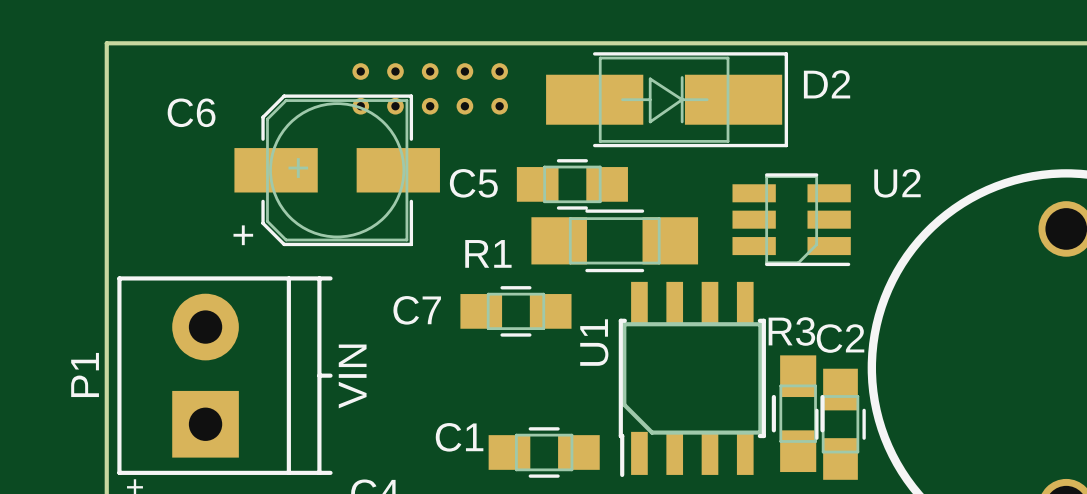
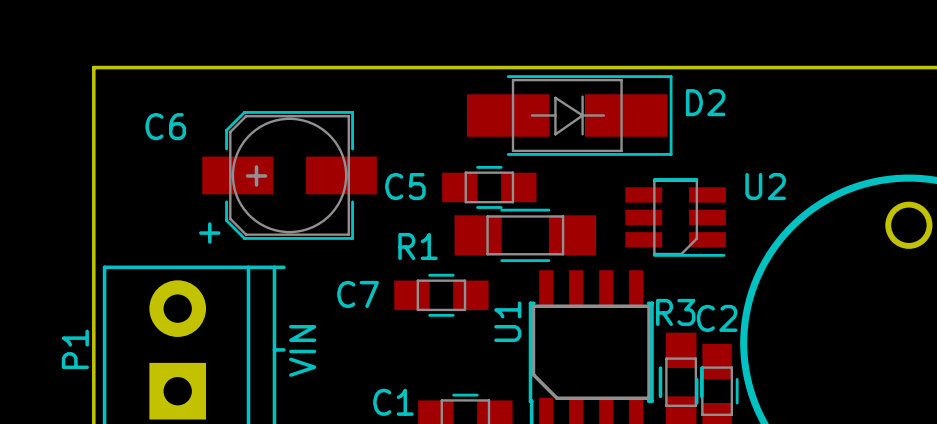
part: (360, 71) -> none
part: (395, 71) -> none
part: (430, 71) -> none
part: (464, 71) -> none
part: (499, 71) -> none
part: (360, 106) -> none
part: (395, 106) -> none
part: (430, 106) -> none
part: (464, 106) -> none
part: (499, 106) -> none

